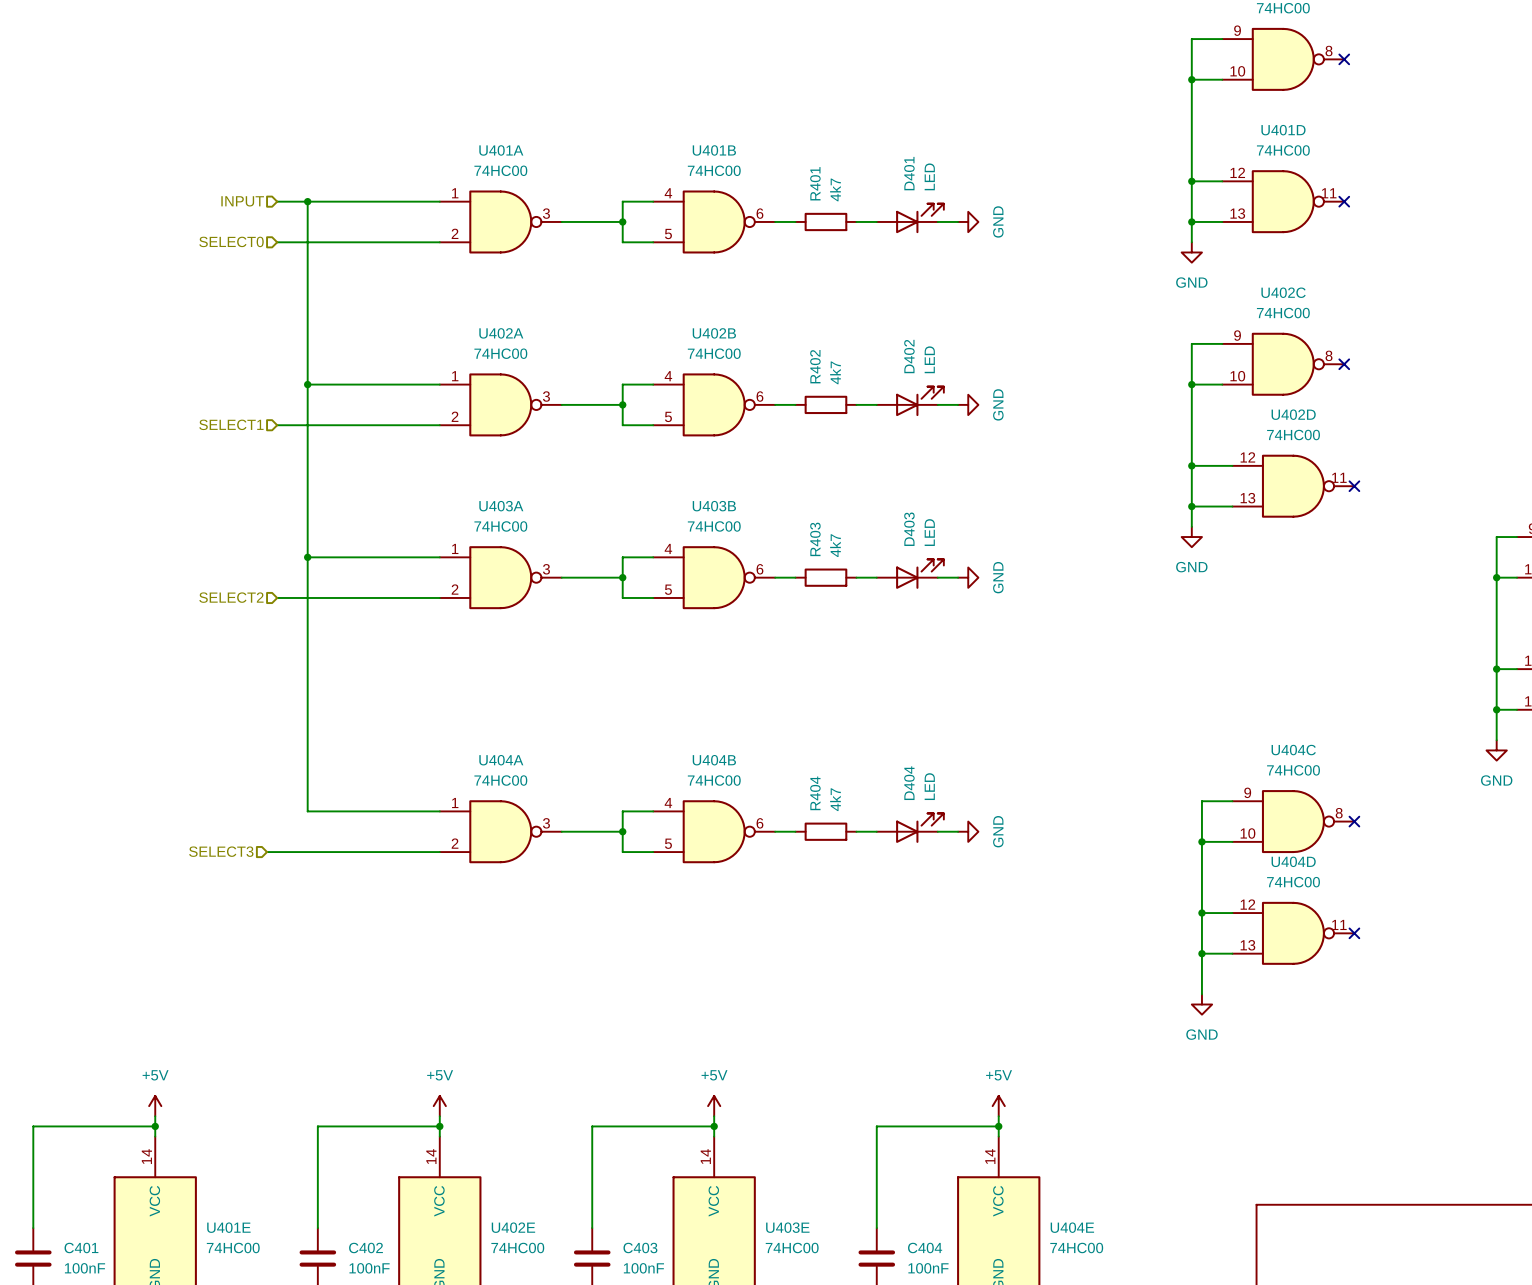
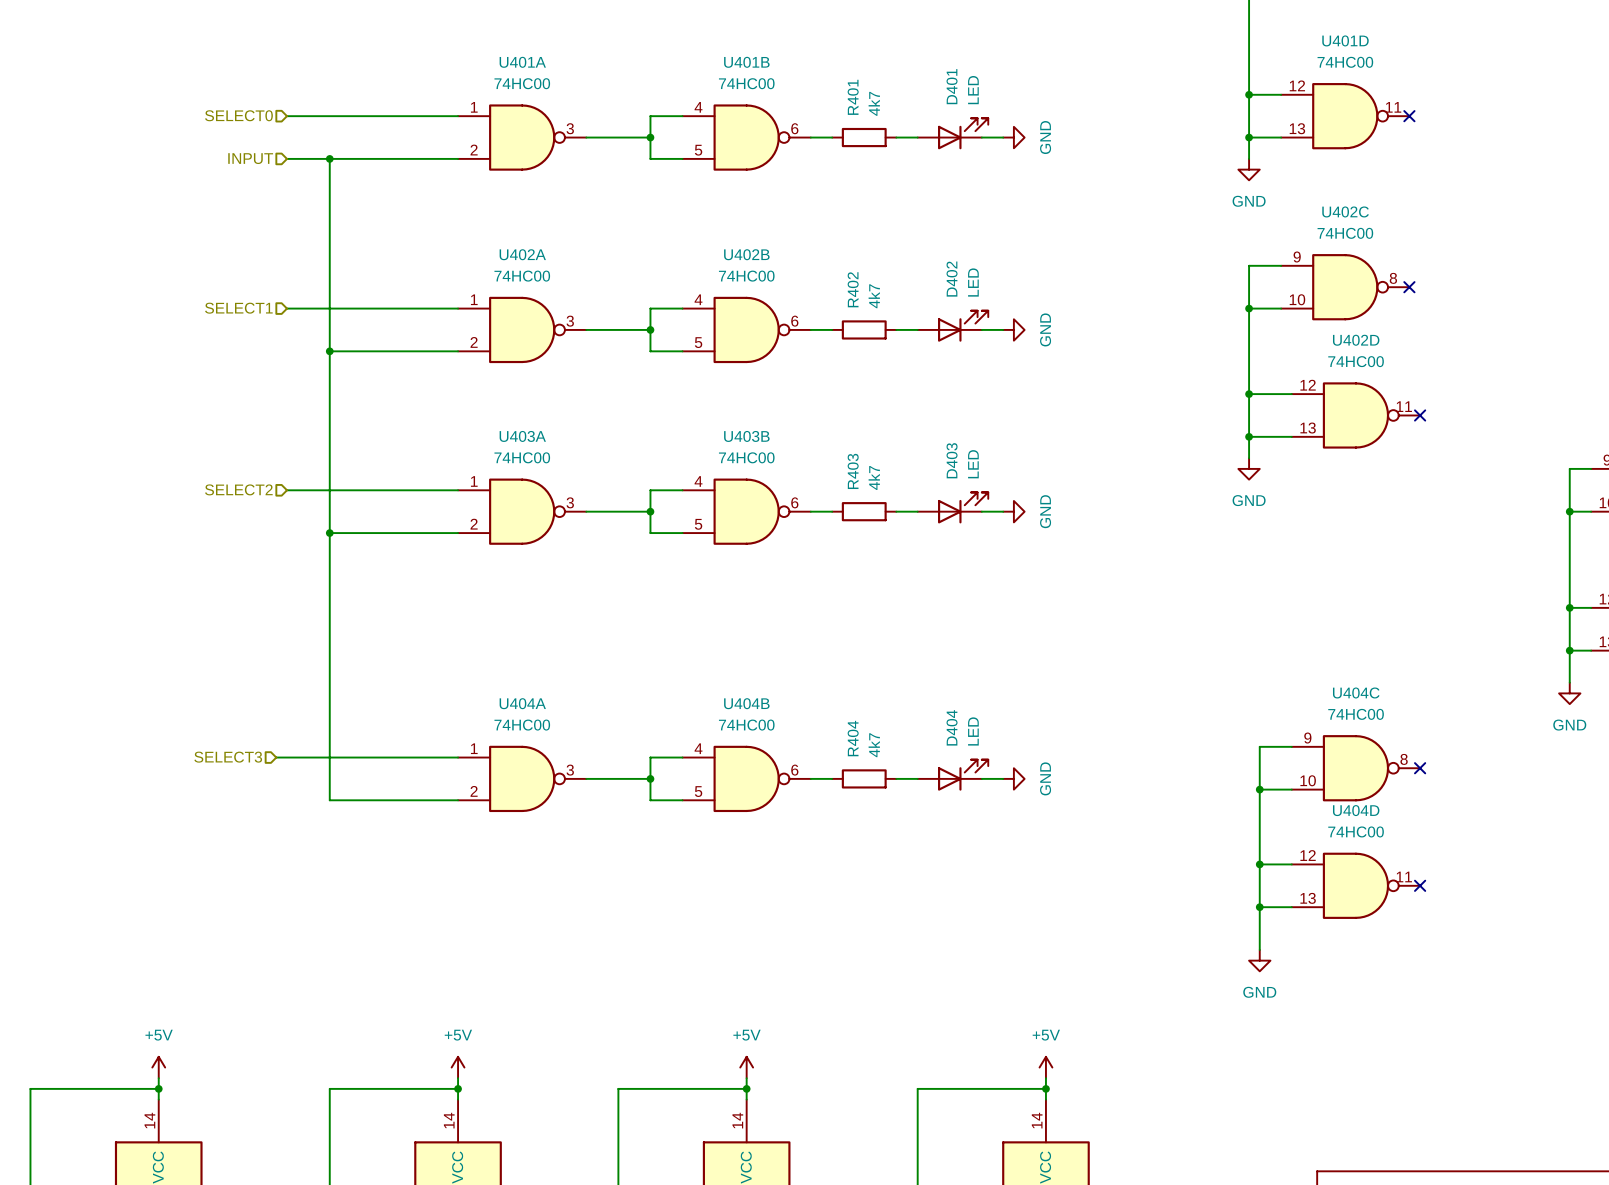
hierarchical label: INPUT (242, 201) -> SELECT0 (238, 115)
wire: (307, 201) (307, 811) -> (276, 757) (319, 757)
junction position: (307, 201) -> (329, 158)
hierarchical label: SELECT0 (231, 241) -> INPUT (250, 158)
wire: none -> (287, 308) (319, 308)
junction position: (307, 384) -> (329, 351)
hierarchical label position: SELECT1 (231, 424) -> SELECT1 (238, 308)
wire: (277, 425) (317, 425) -> none
wire: none -> (287, 490) (319, 490)
junction position: (307, 557) -> (329, 533)
hierarchical label position: SELECT2 (231, 597) -> SELECT2 (238, 489)
wire: (277, 597) (317, 597) -> none
hierarchical label position: SELECT3 (221, 851) -> SELECT3 (228, 757)
wire: (267, 852) (317, 852) -> (329, 158) (329, 800)

